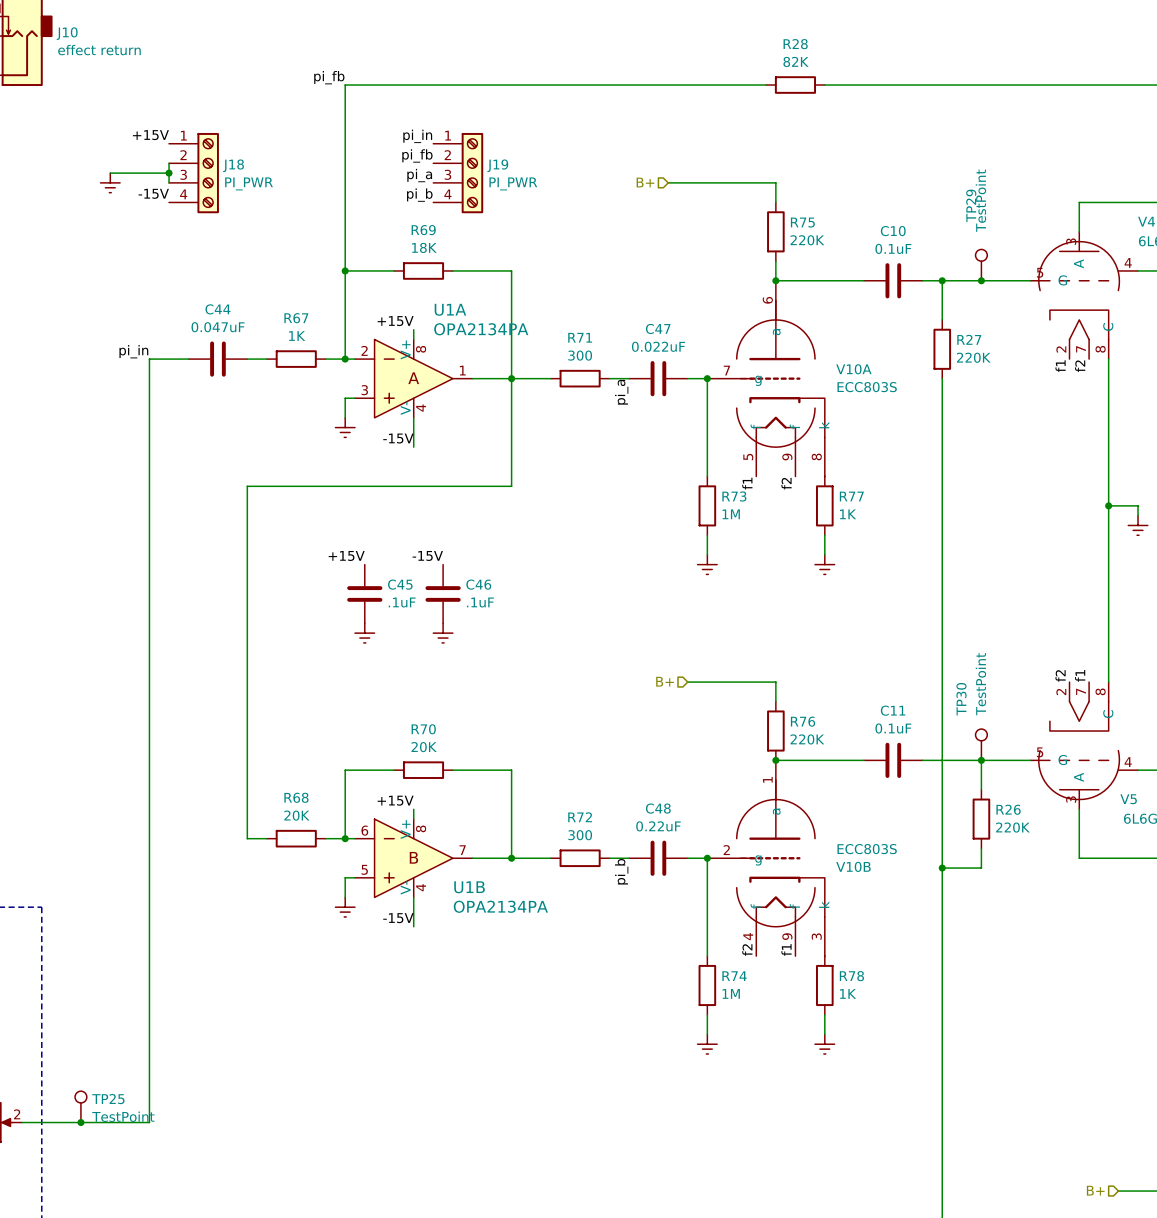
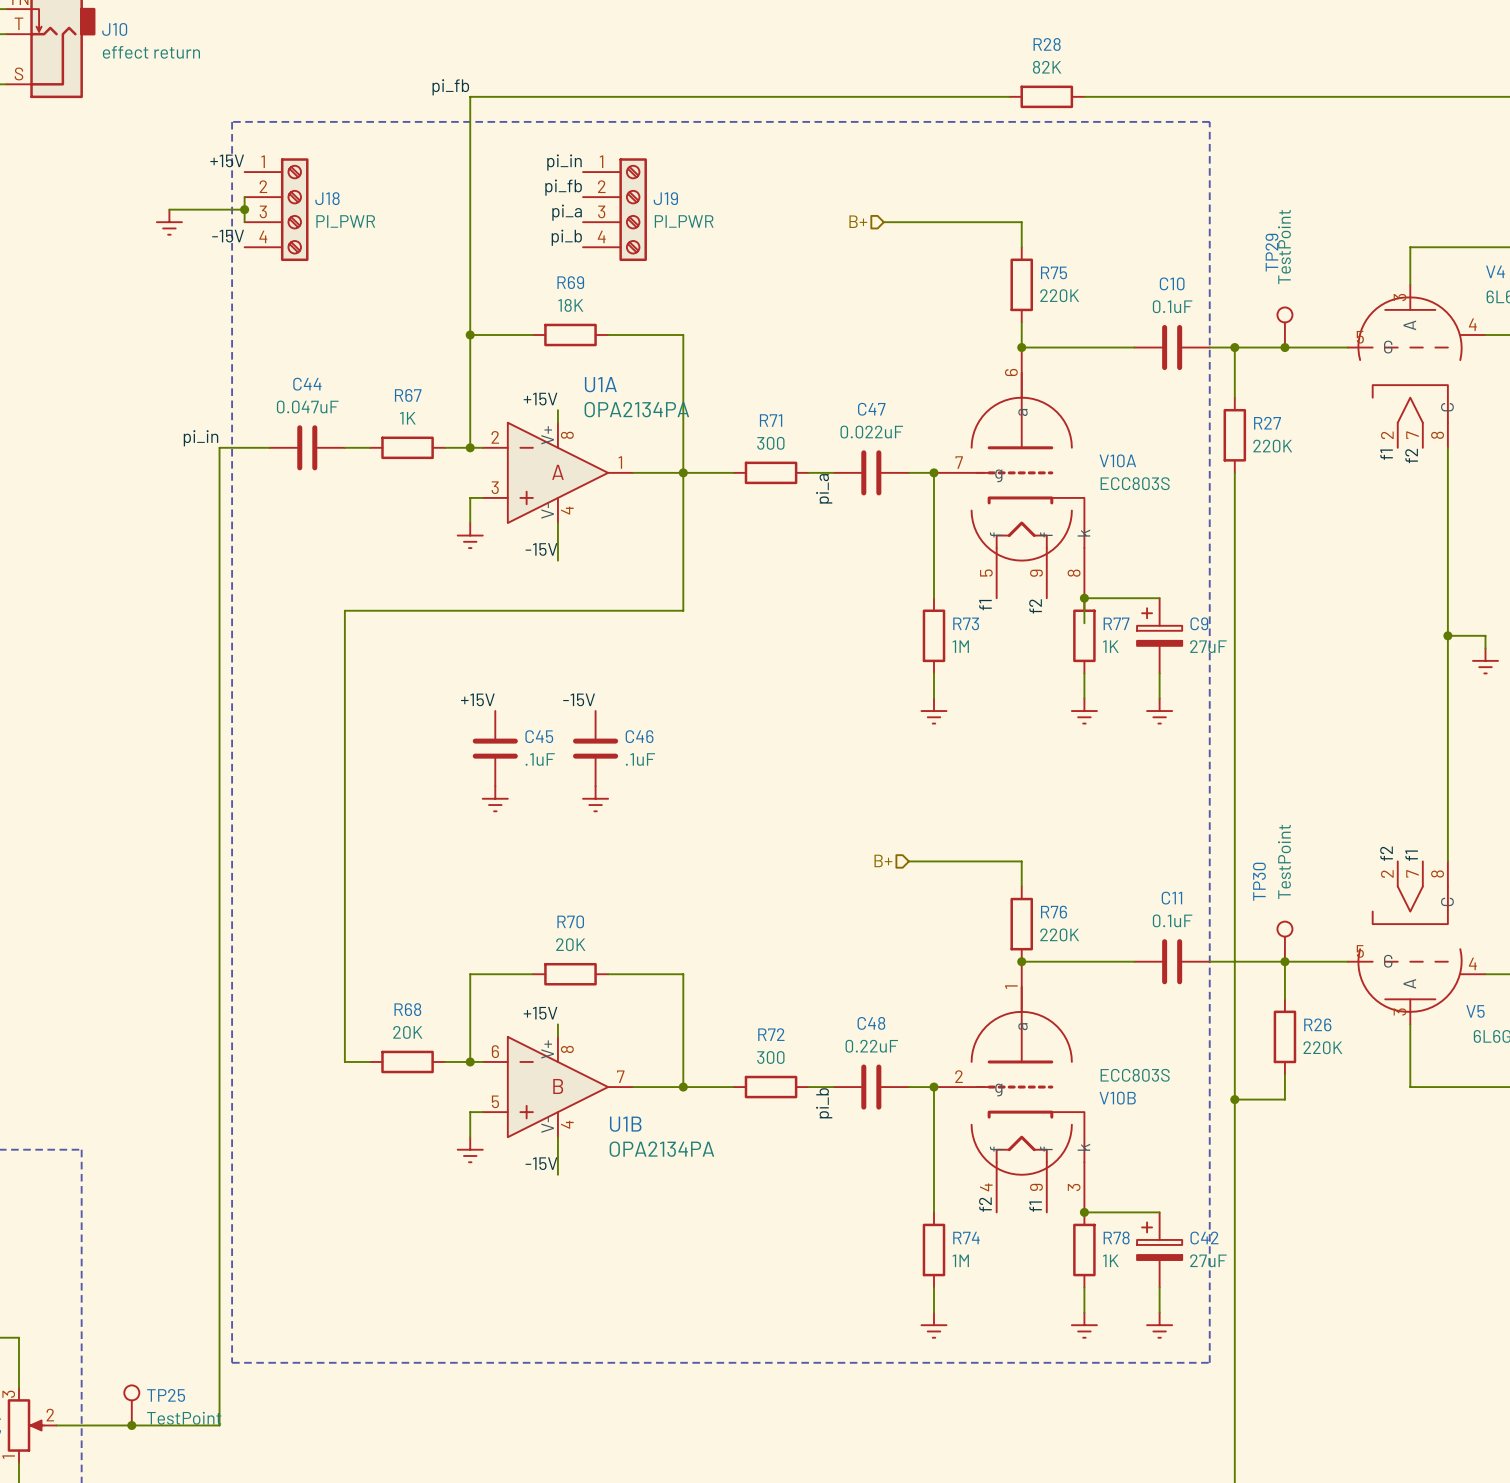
line: none -> (232, 121) (232, 1362) (1209, 1362) (1209, 121) (232, 121)
junction: none -> (1084, 598)
wire: none -> (1159, 598) (1084, 598) (1084, 623)
C9: none -> 27uF (1159, 635)
wire: none -> (1159, 673) (1159, 698)
power symbol: none -> (1159, 711)
wire: none -> (1084, 1212) (1159, 1212)
junction: none -> (1084, 1212)
C42: none -> 27uF (1159, 1249)
wire: none -> (1159, 1287) (1159, 1312)
power symbol: none -> (1159, 1325)

